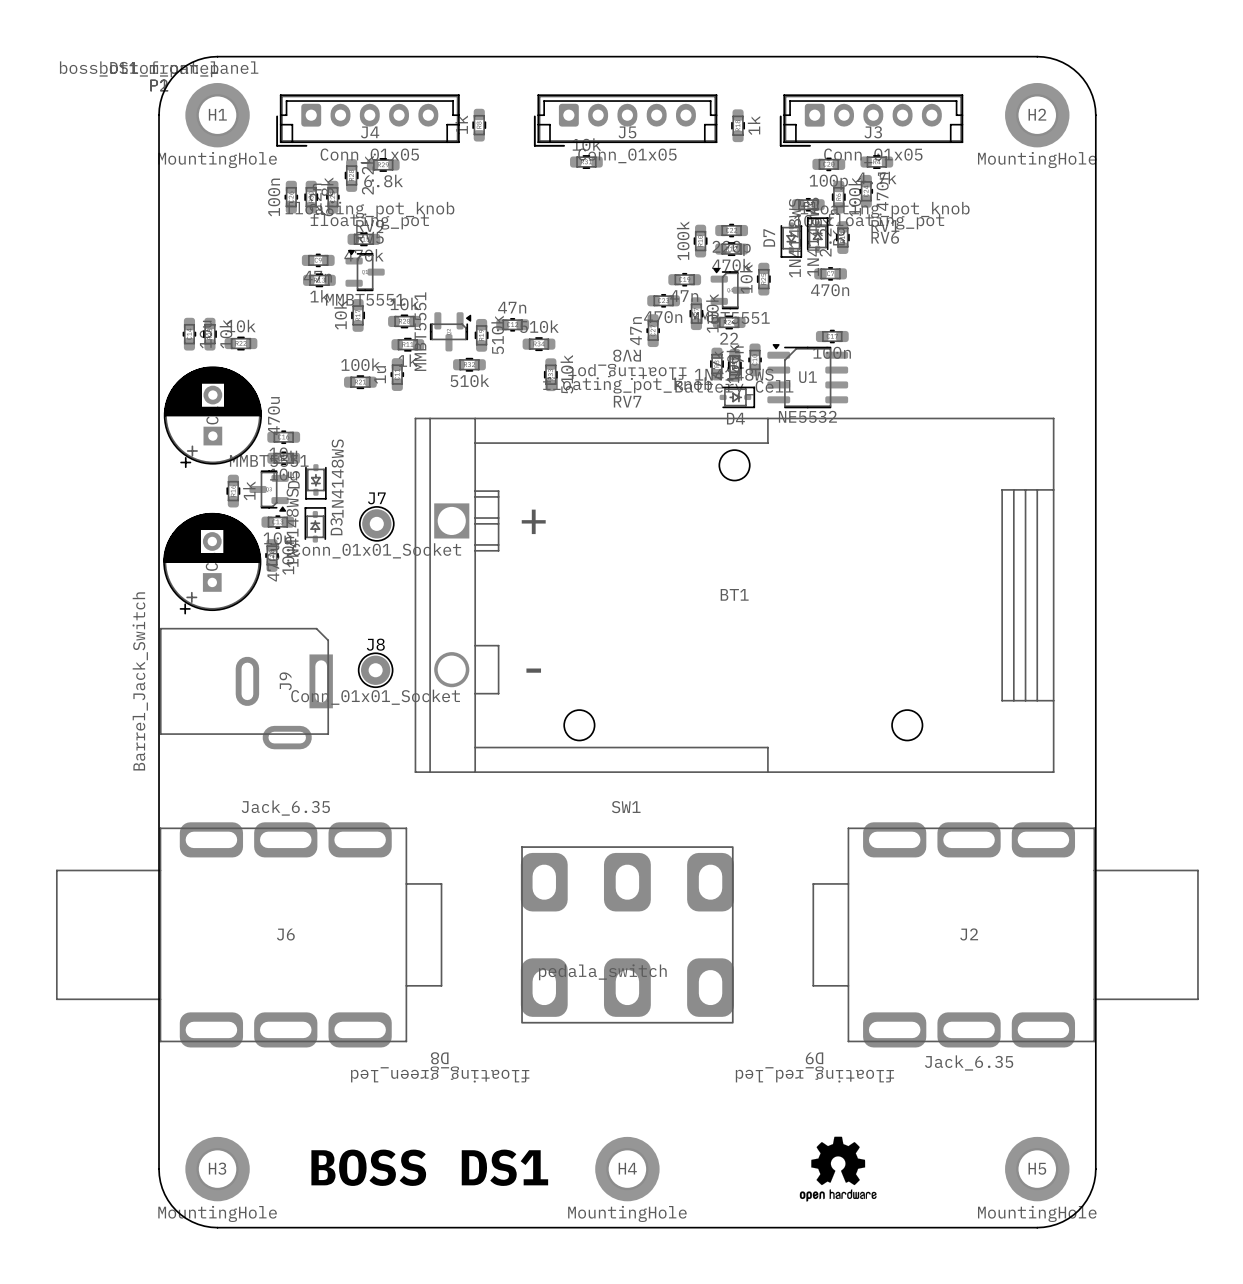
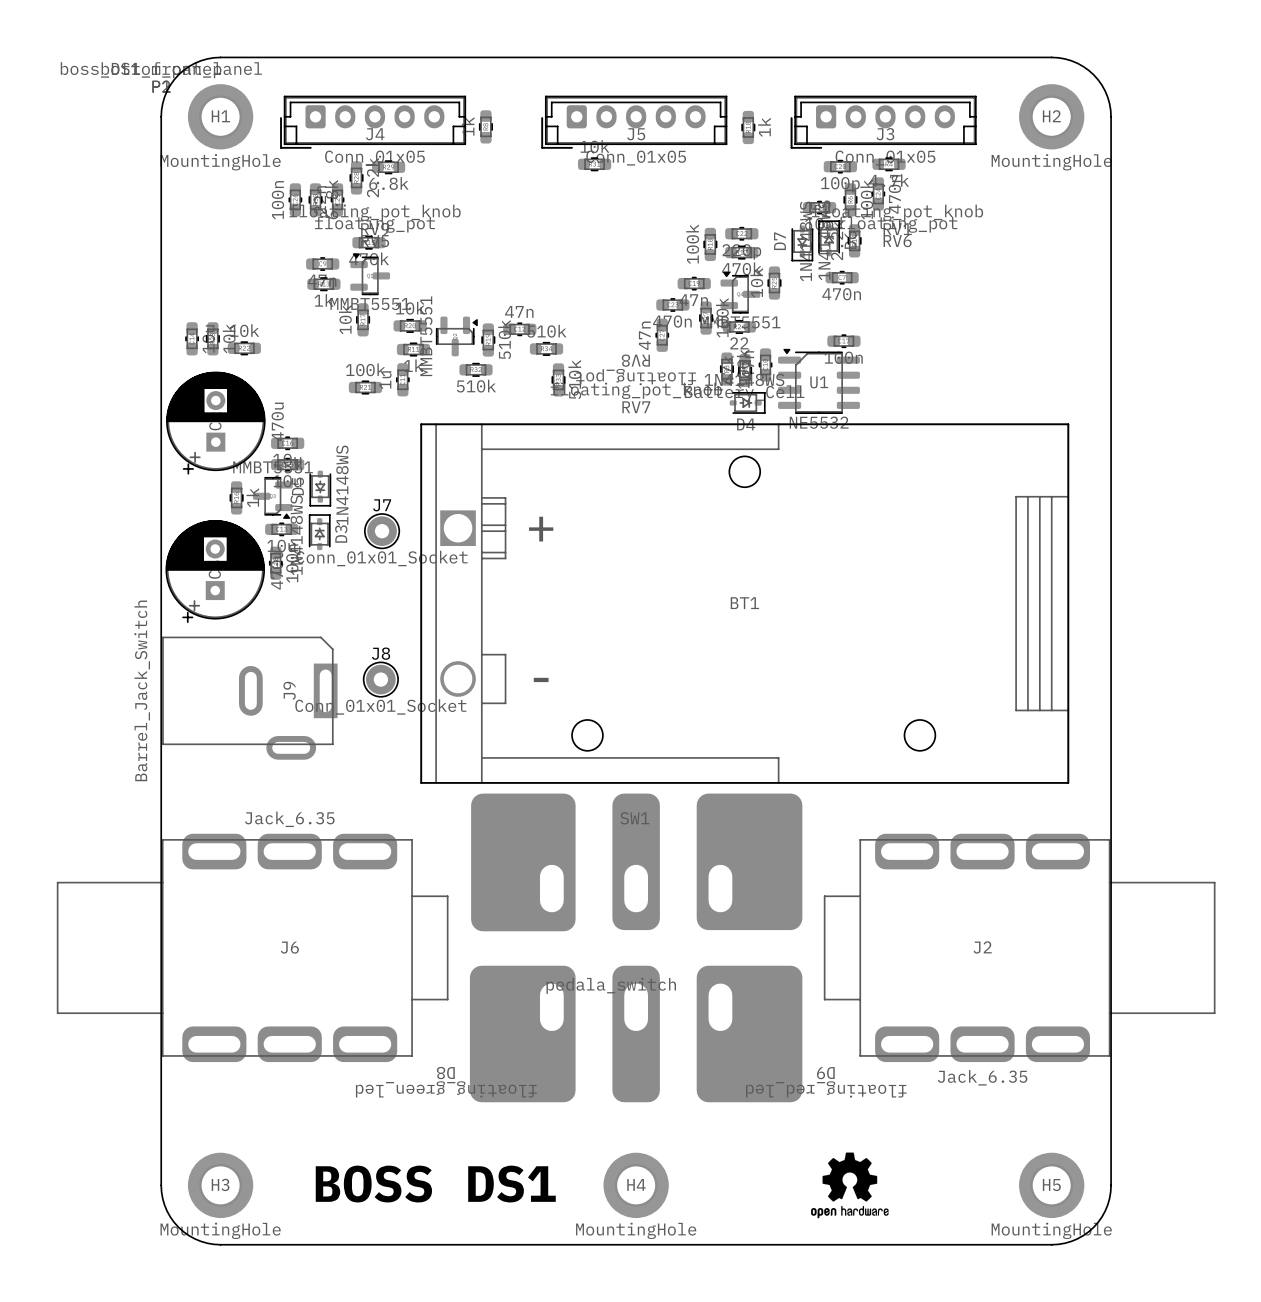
BT1 footprint: [414, 417, 1055, 773] -> [420, 423, 1070, 784]
SW1 footprint: [520, 846, 734, 1024] -> [469, 793, 803, 1103]

